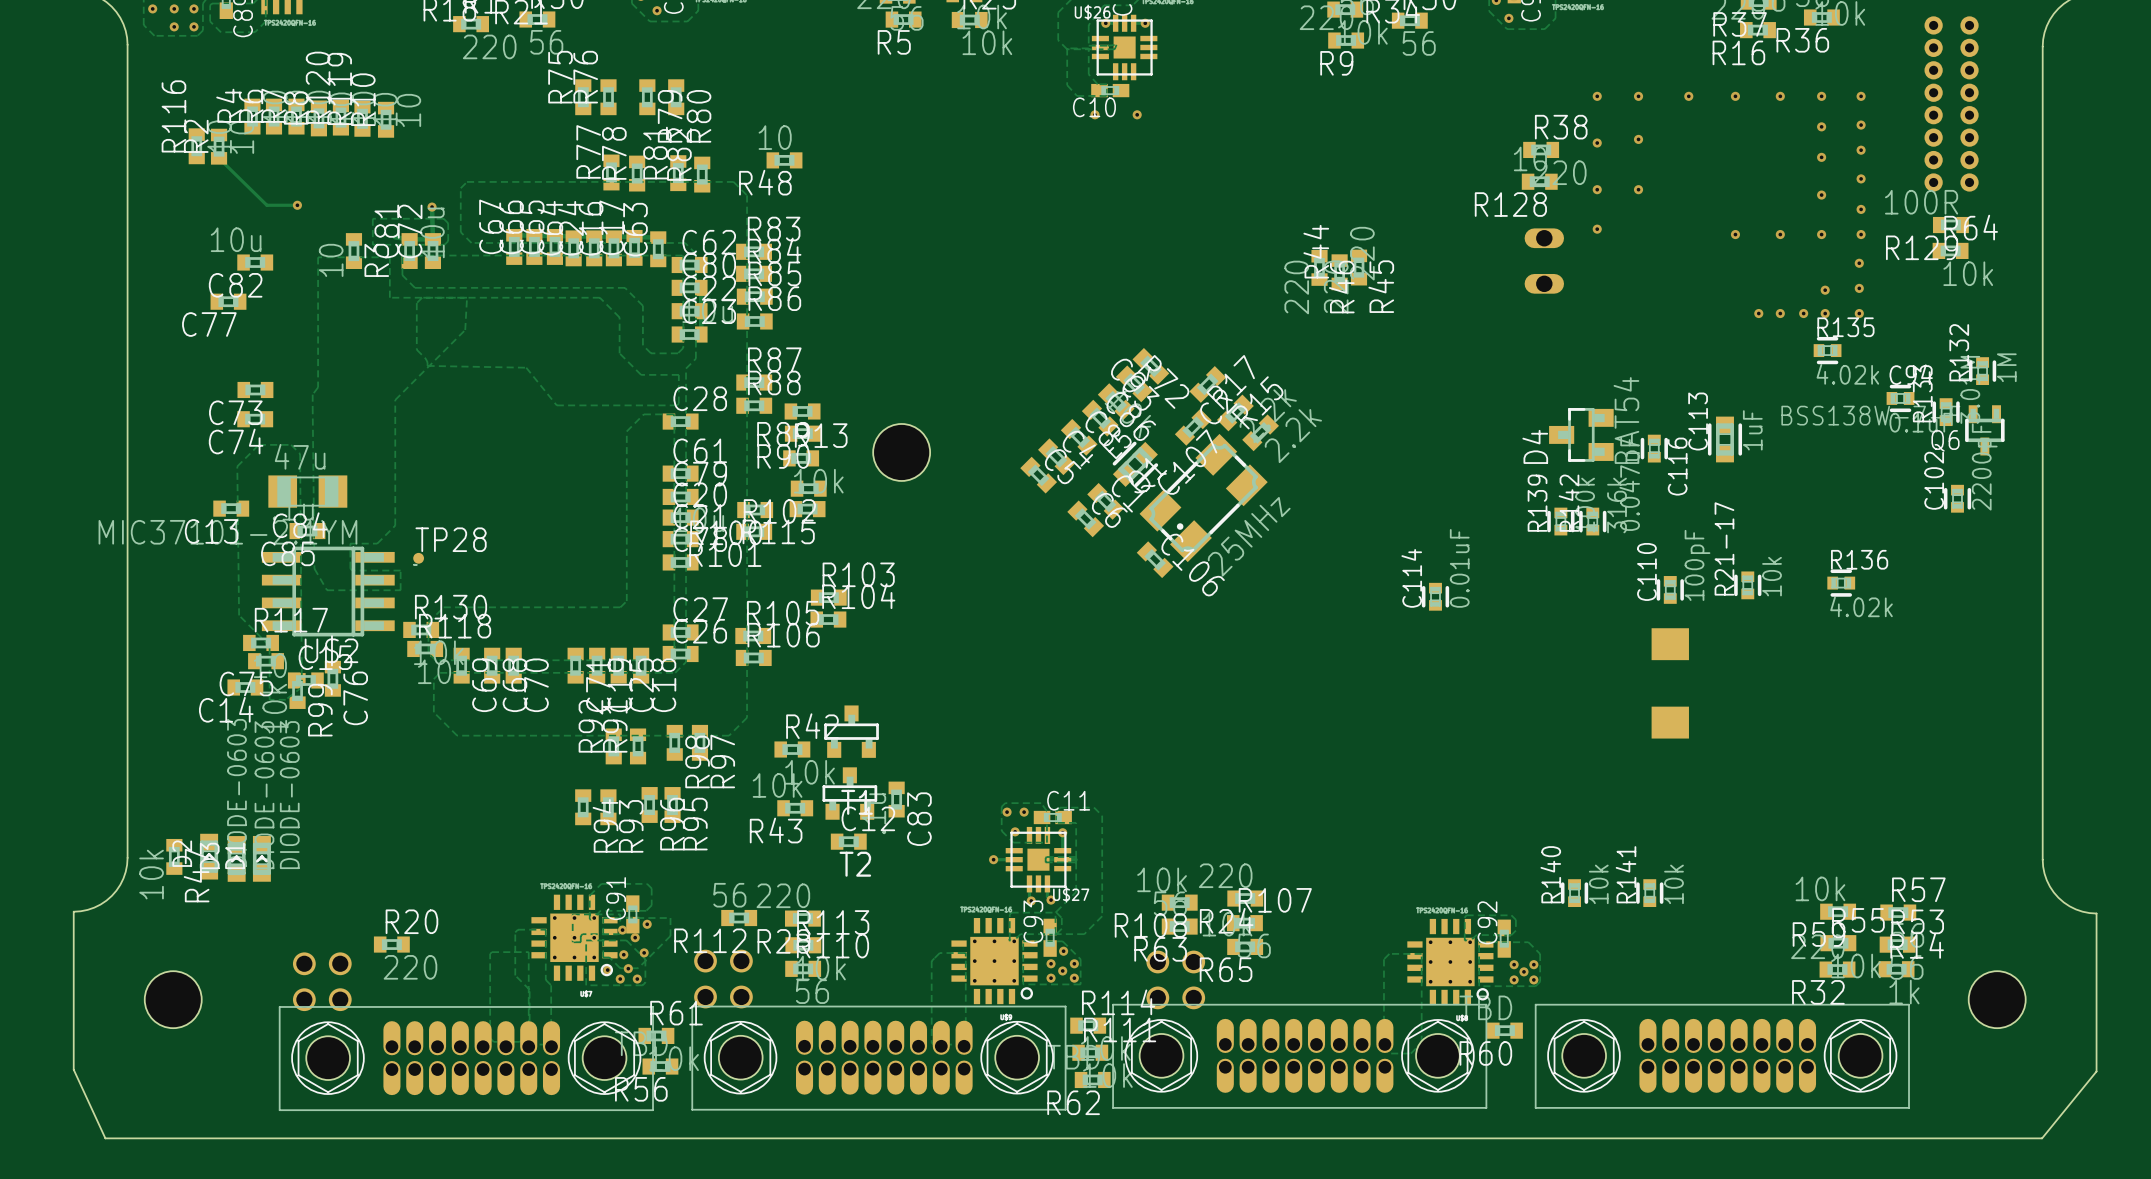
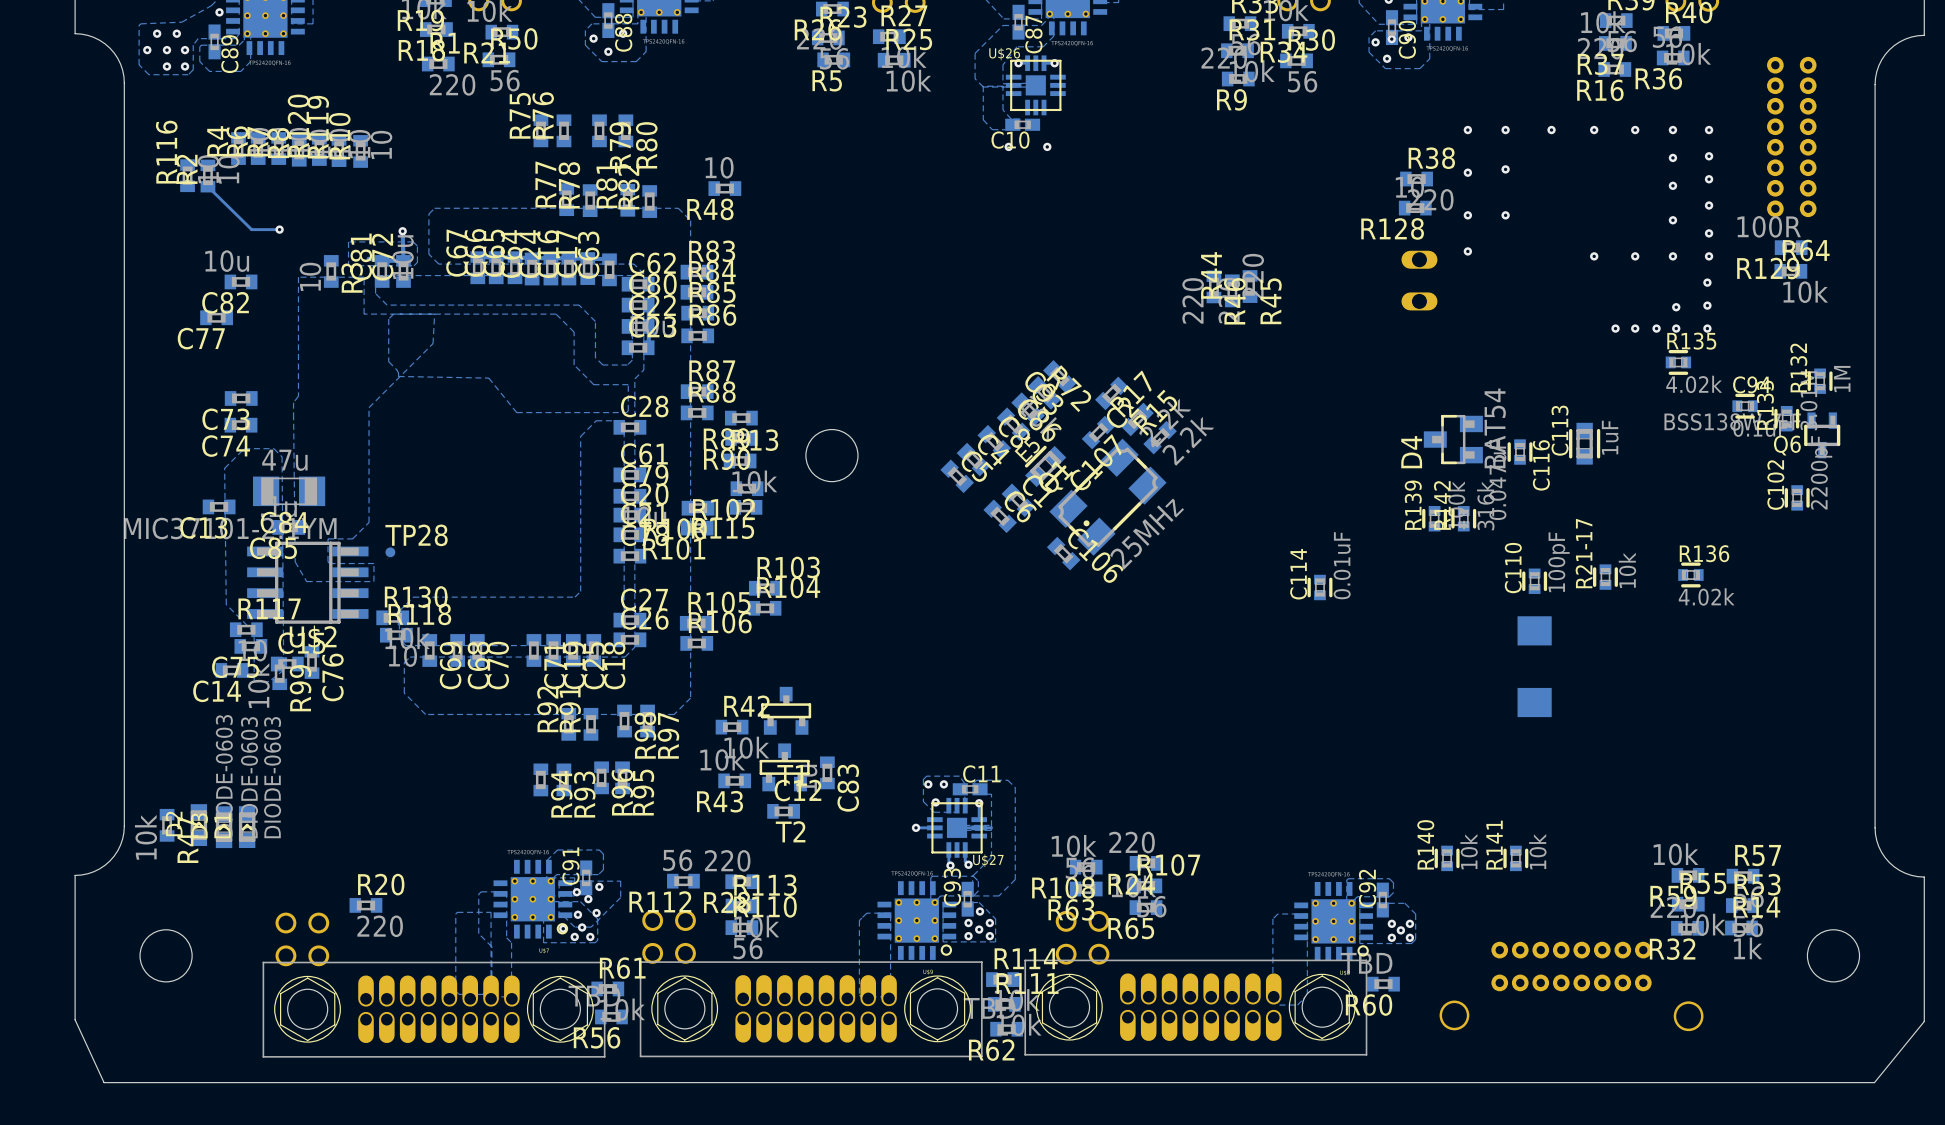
part: none -> (1571, 986)
part: (1722, 1056) -> none

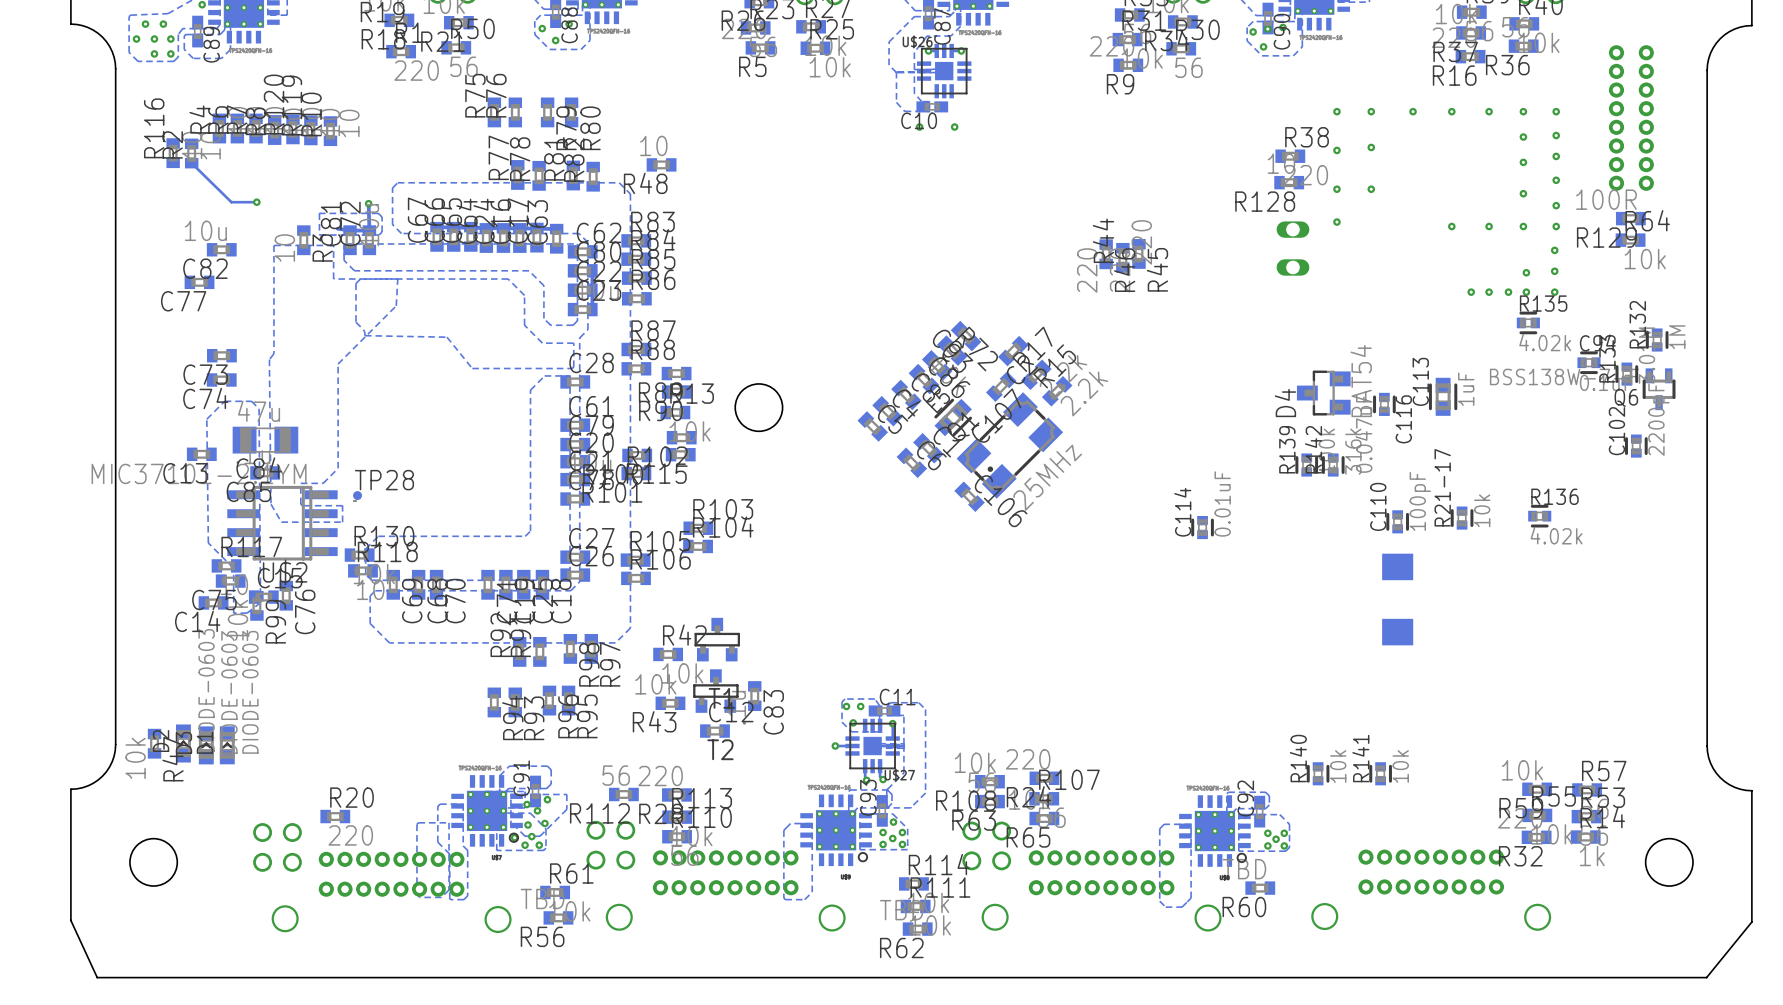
part: none -> (725, 890)
part: none -> (1101, 890)
part: none -> (391, 892)
part: (1195, 1007) -> none
part: (434, 1009) -> none
part: (811, 1009) -> none

